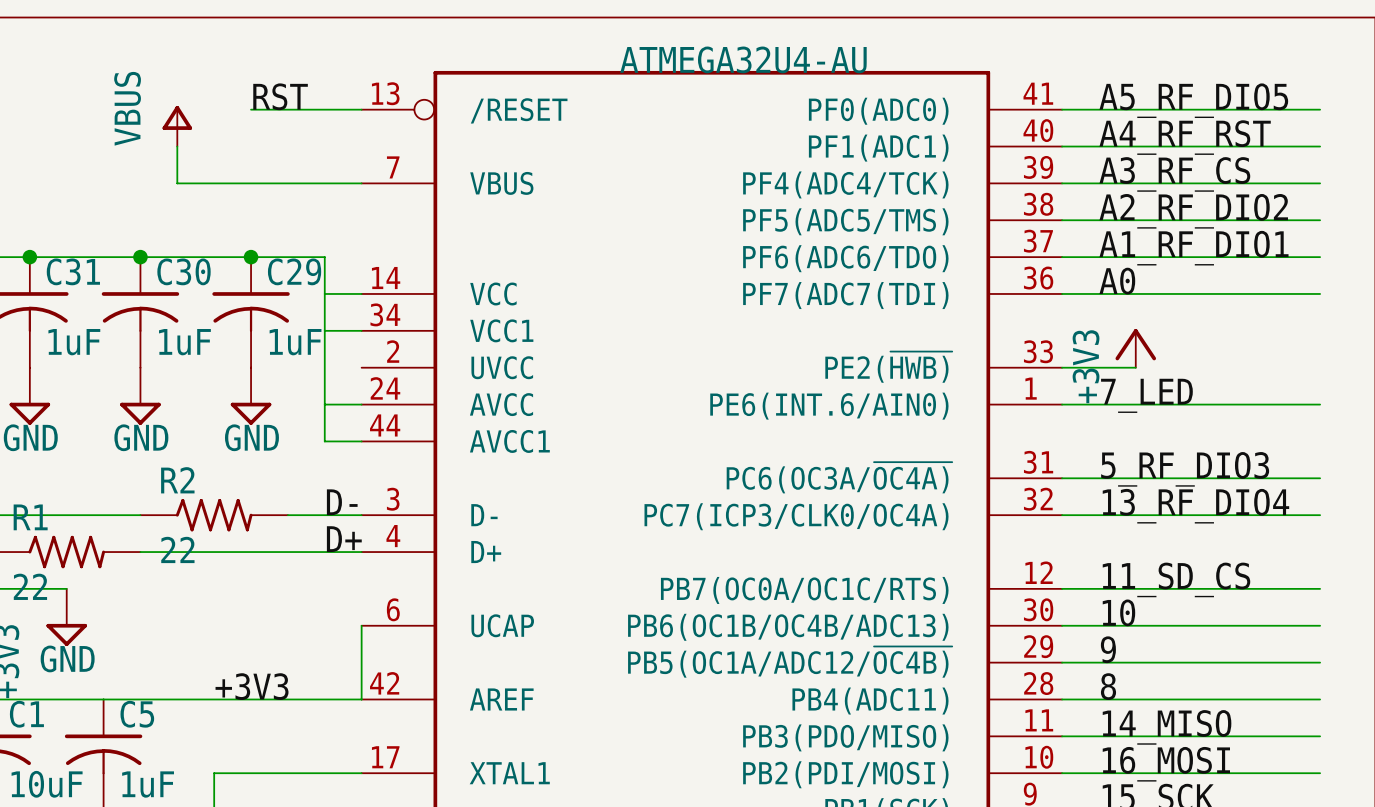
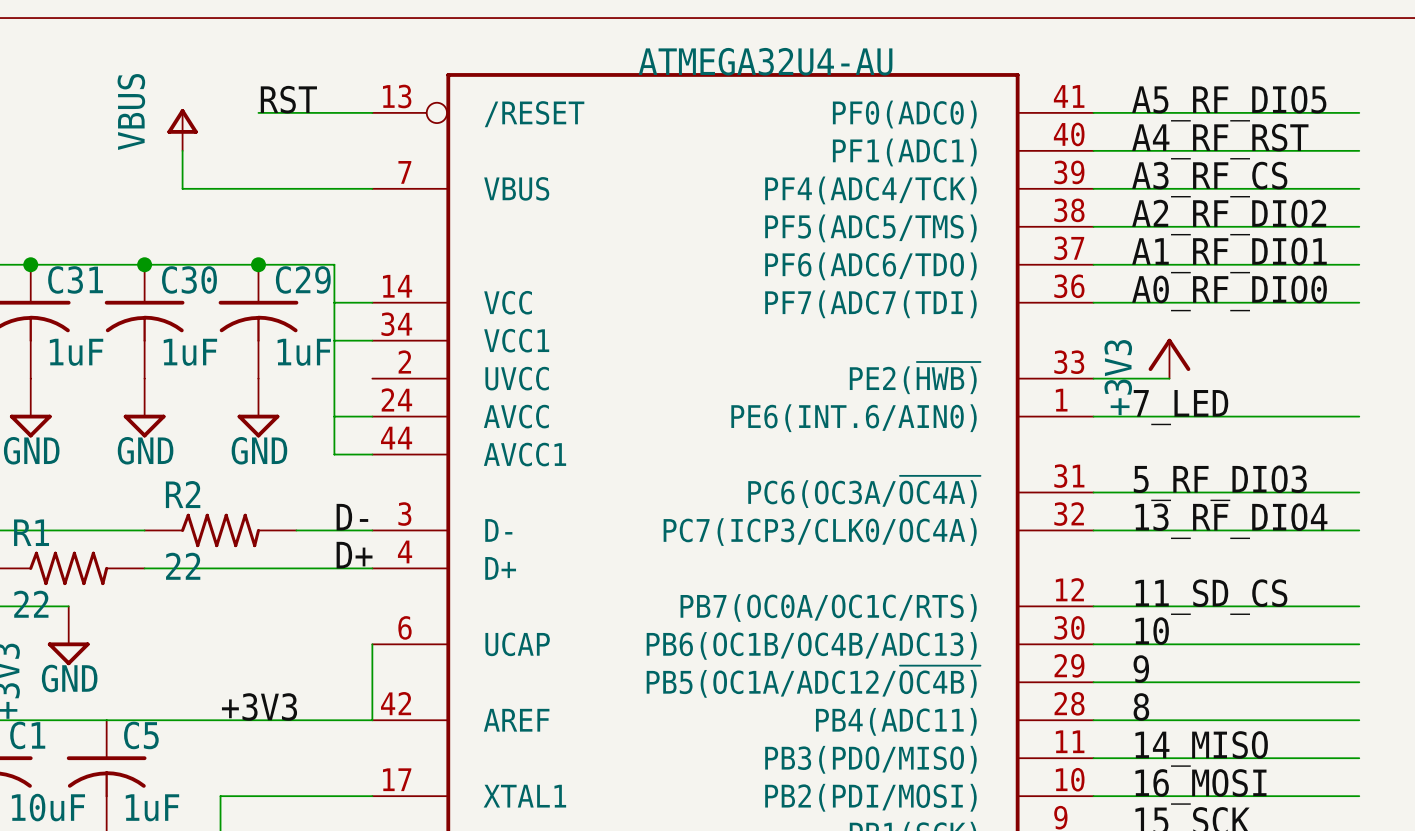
label: A0 (1117, 281) -> A0_RF_DIO0 (1229, 293)

